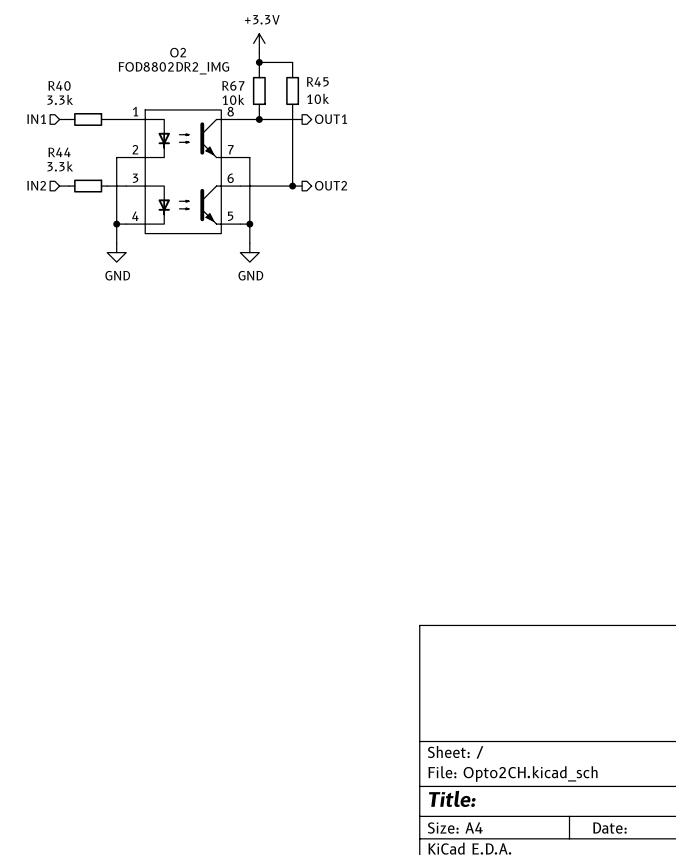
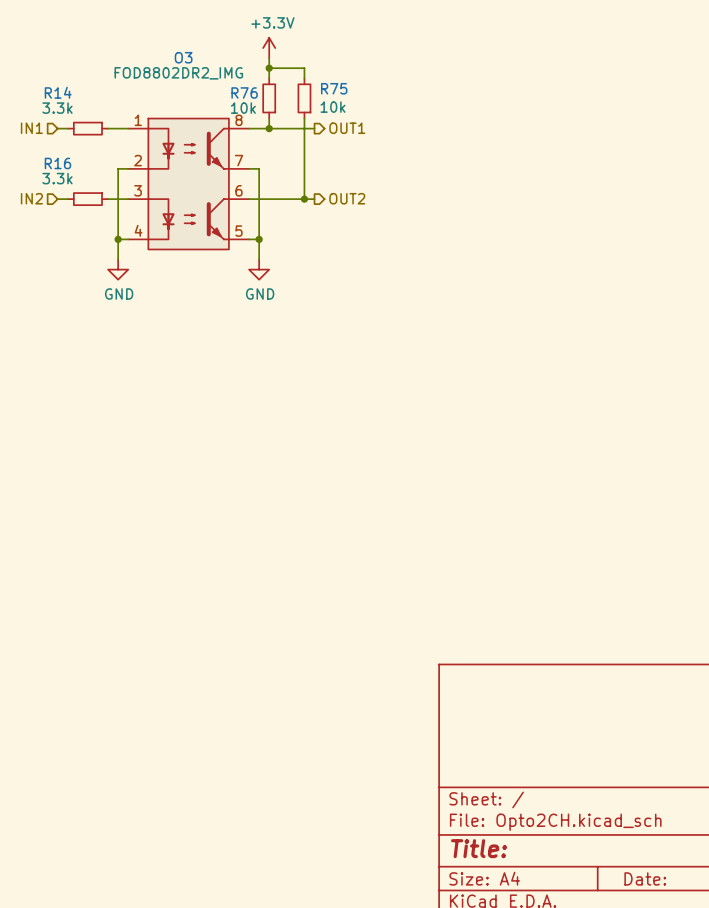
O2 name: O2 (178, 52) -> O3 (183, 57)
R45 name: R45 (317, 81) -> R75 (334, 88)
R40 name: R40 (59, 85) -> R14 (58, 92)
R67 name: R67 (233, 85) -> R76 (244, 92)
R44 name: R44 (59, 152) -> R16 (57, 163)

